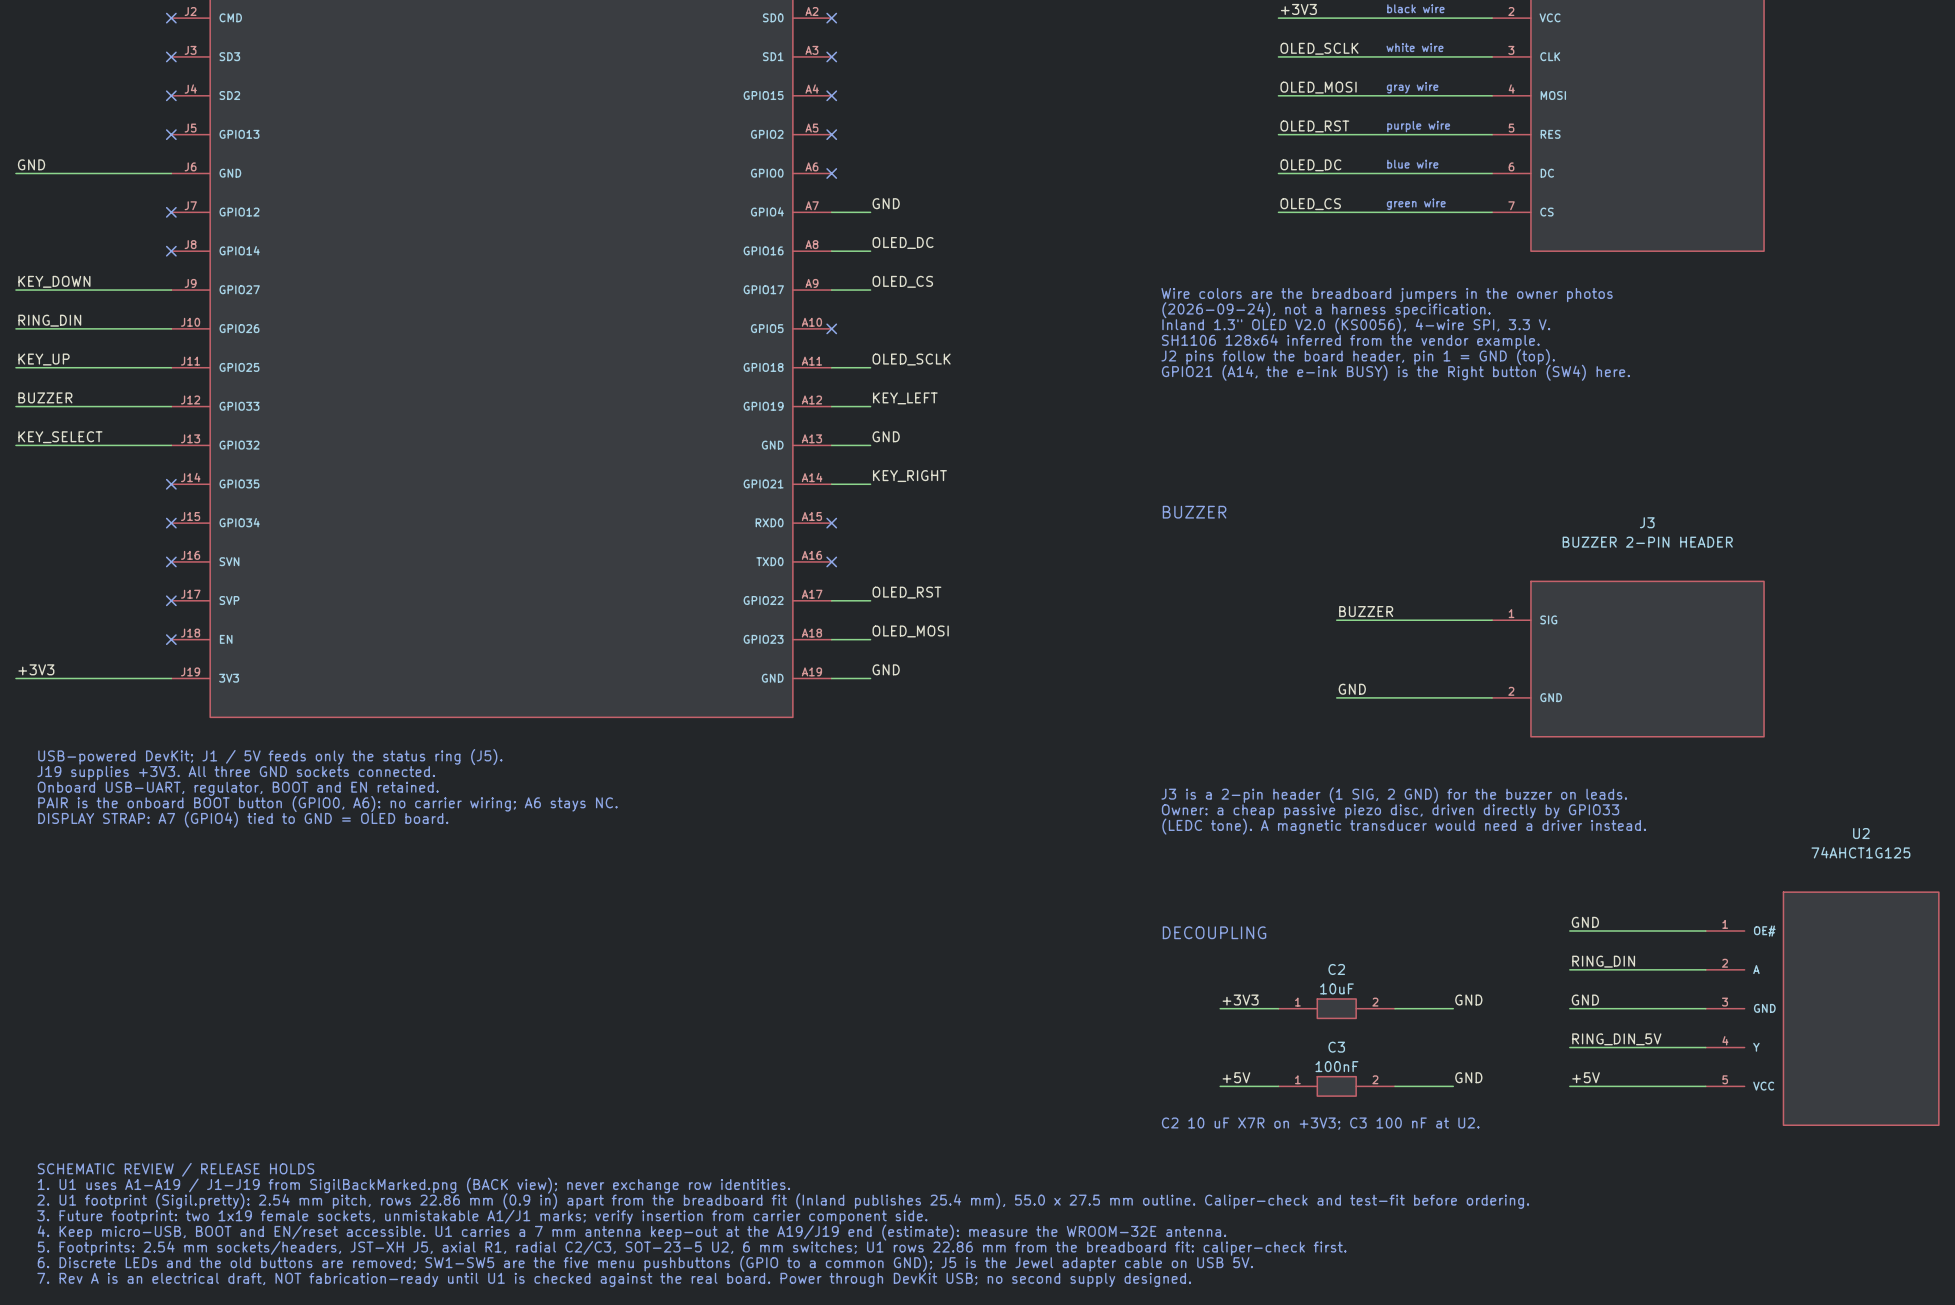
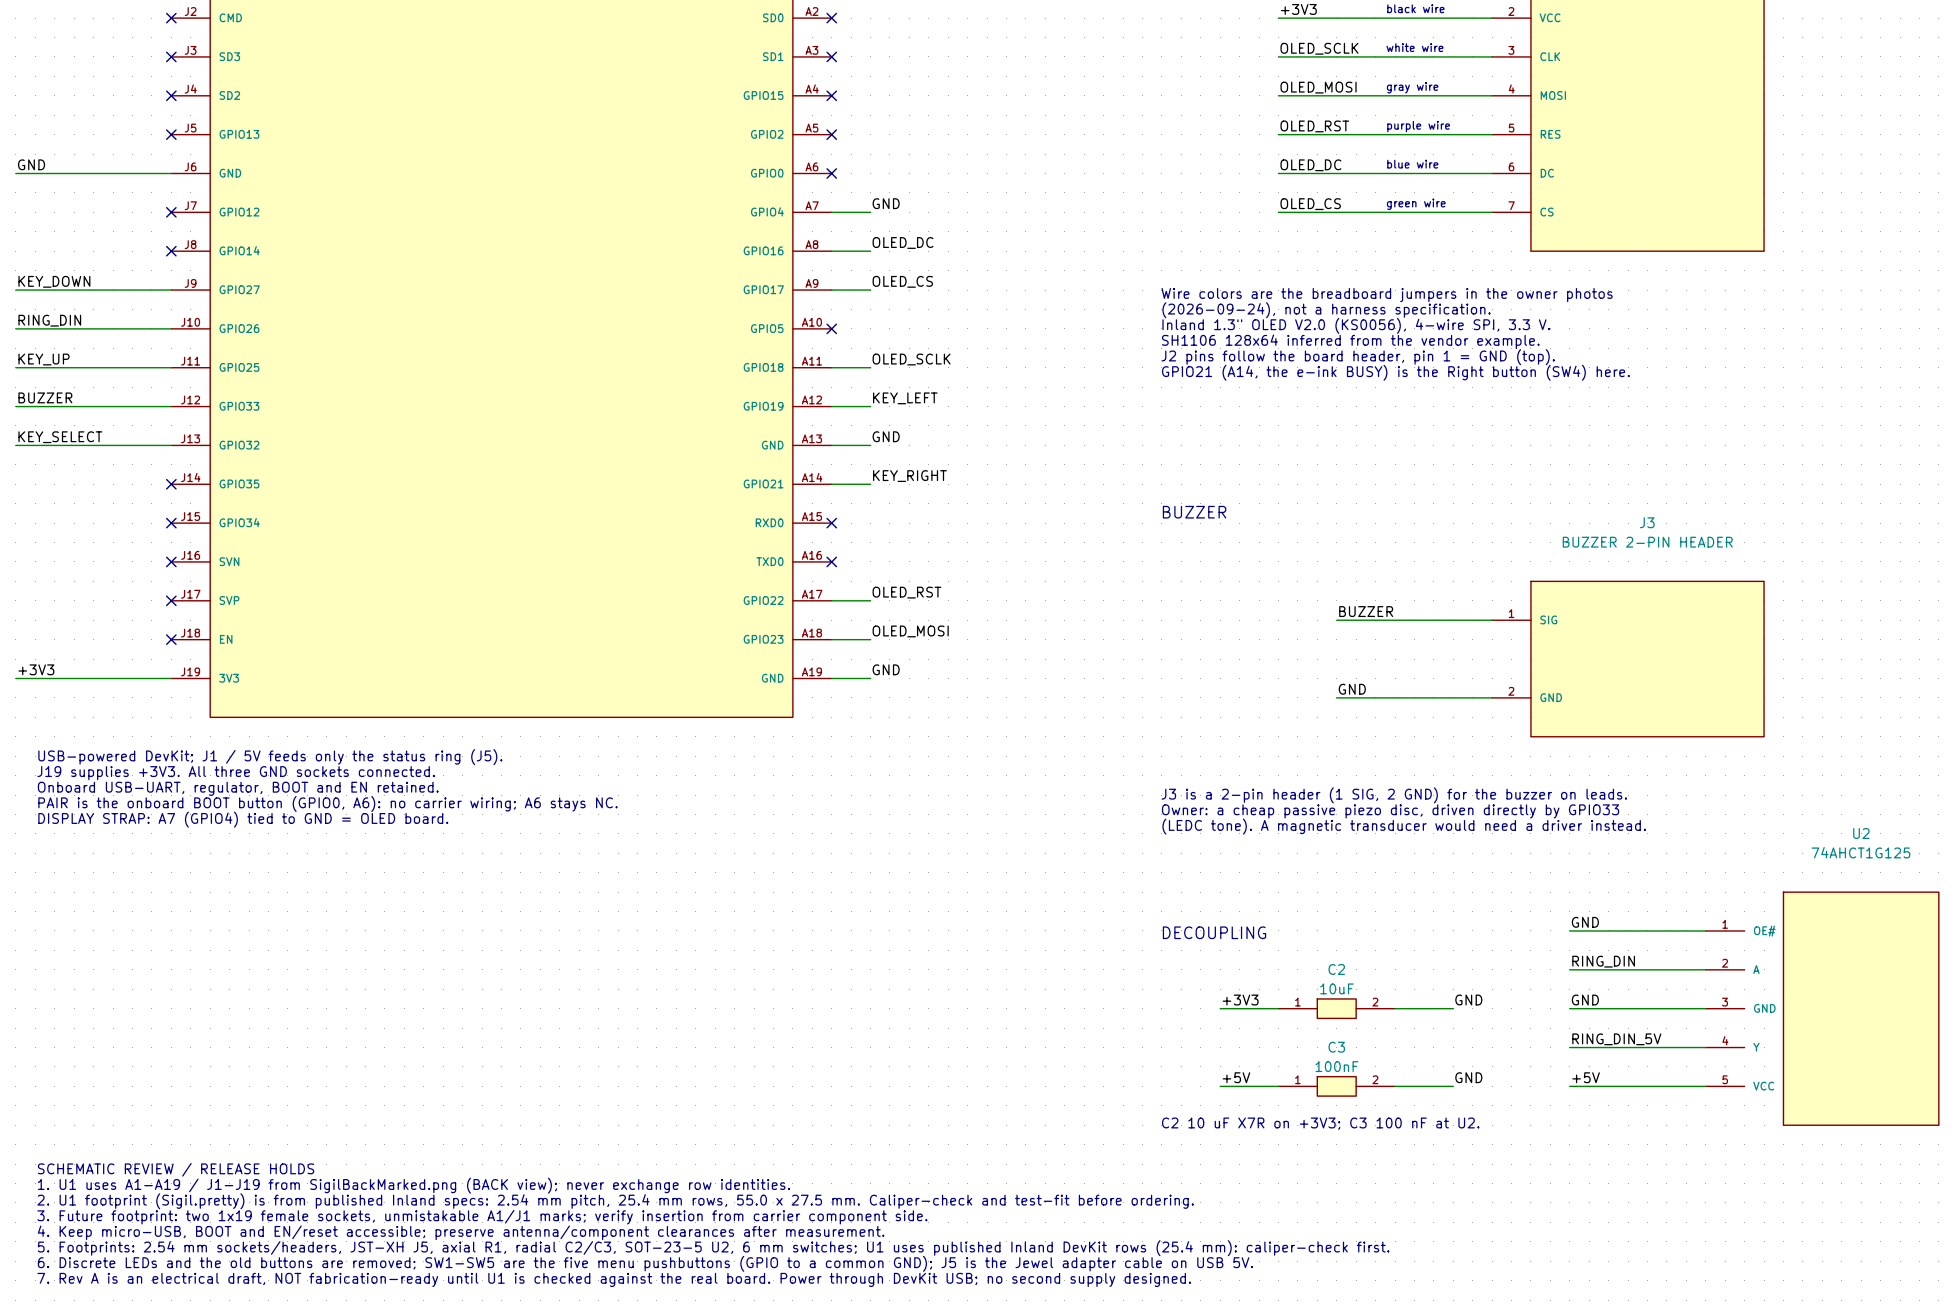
text: 2. U1 footprint (Sigil.pretty): 2.54 mm pitch, rows 22.86 mm (0.9 in) apart from the breadboard fit (Inland publishes 25.4 mm), 55.0 x 27.5 mm outline. Caliper-check and test-fit before ordering. (783, 1201) -> 2. U1 footprint (Sigil.pretty) is from published Inland specs: 2.54 mm pitch, 25.4 mm rows, 55.0 x 27.5 mm. Caliper-check and test-fit before ordering. (615, 1201)
text: 4. Keep micro-USB, BOOT and EN/reset accessible. U1 carries a 7 mm antenna keep-out at the A19/J19 end (estimate): measure the WROOM-32E antenna. (632, 1232) -> 4. Keep micro-USB, BOOT and EN/reset accessible; preserve antenna/component clearances after measurement. (461, 1232)
text: 5. Footprints: 2.54 mm sockets/headers, JST-XH J5, axial R1, radial C2/C3, SOT-23-5 U2, 6 mm switches; U1 rows 22.86 mm from the breadboard fit: caliper-check first. (692, 1248) -> 5. Footprints: 2.54 mm sockets/headers, JST-XH J5, axial R1, radial C2/C3, SOT-23-5 U2, 6 mm switches; U1 uses published Inland DevKit rows (25.4 mm): caliper-check first. (713, 1248)

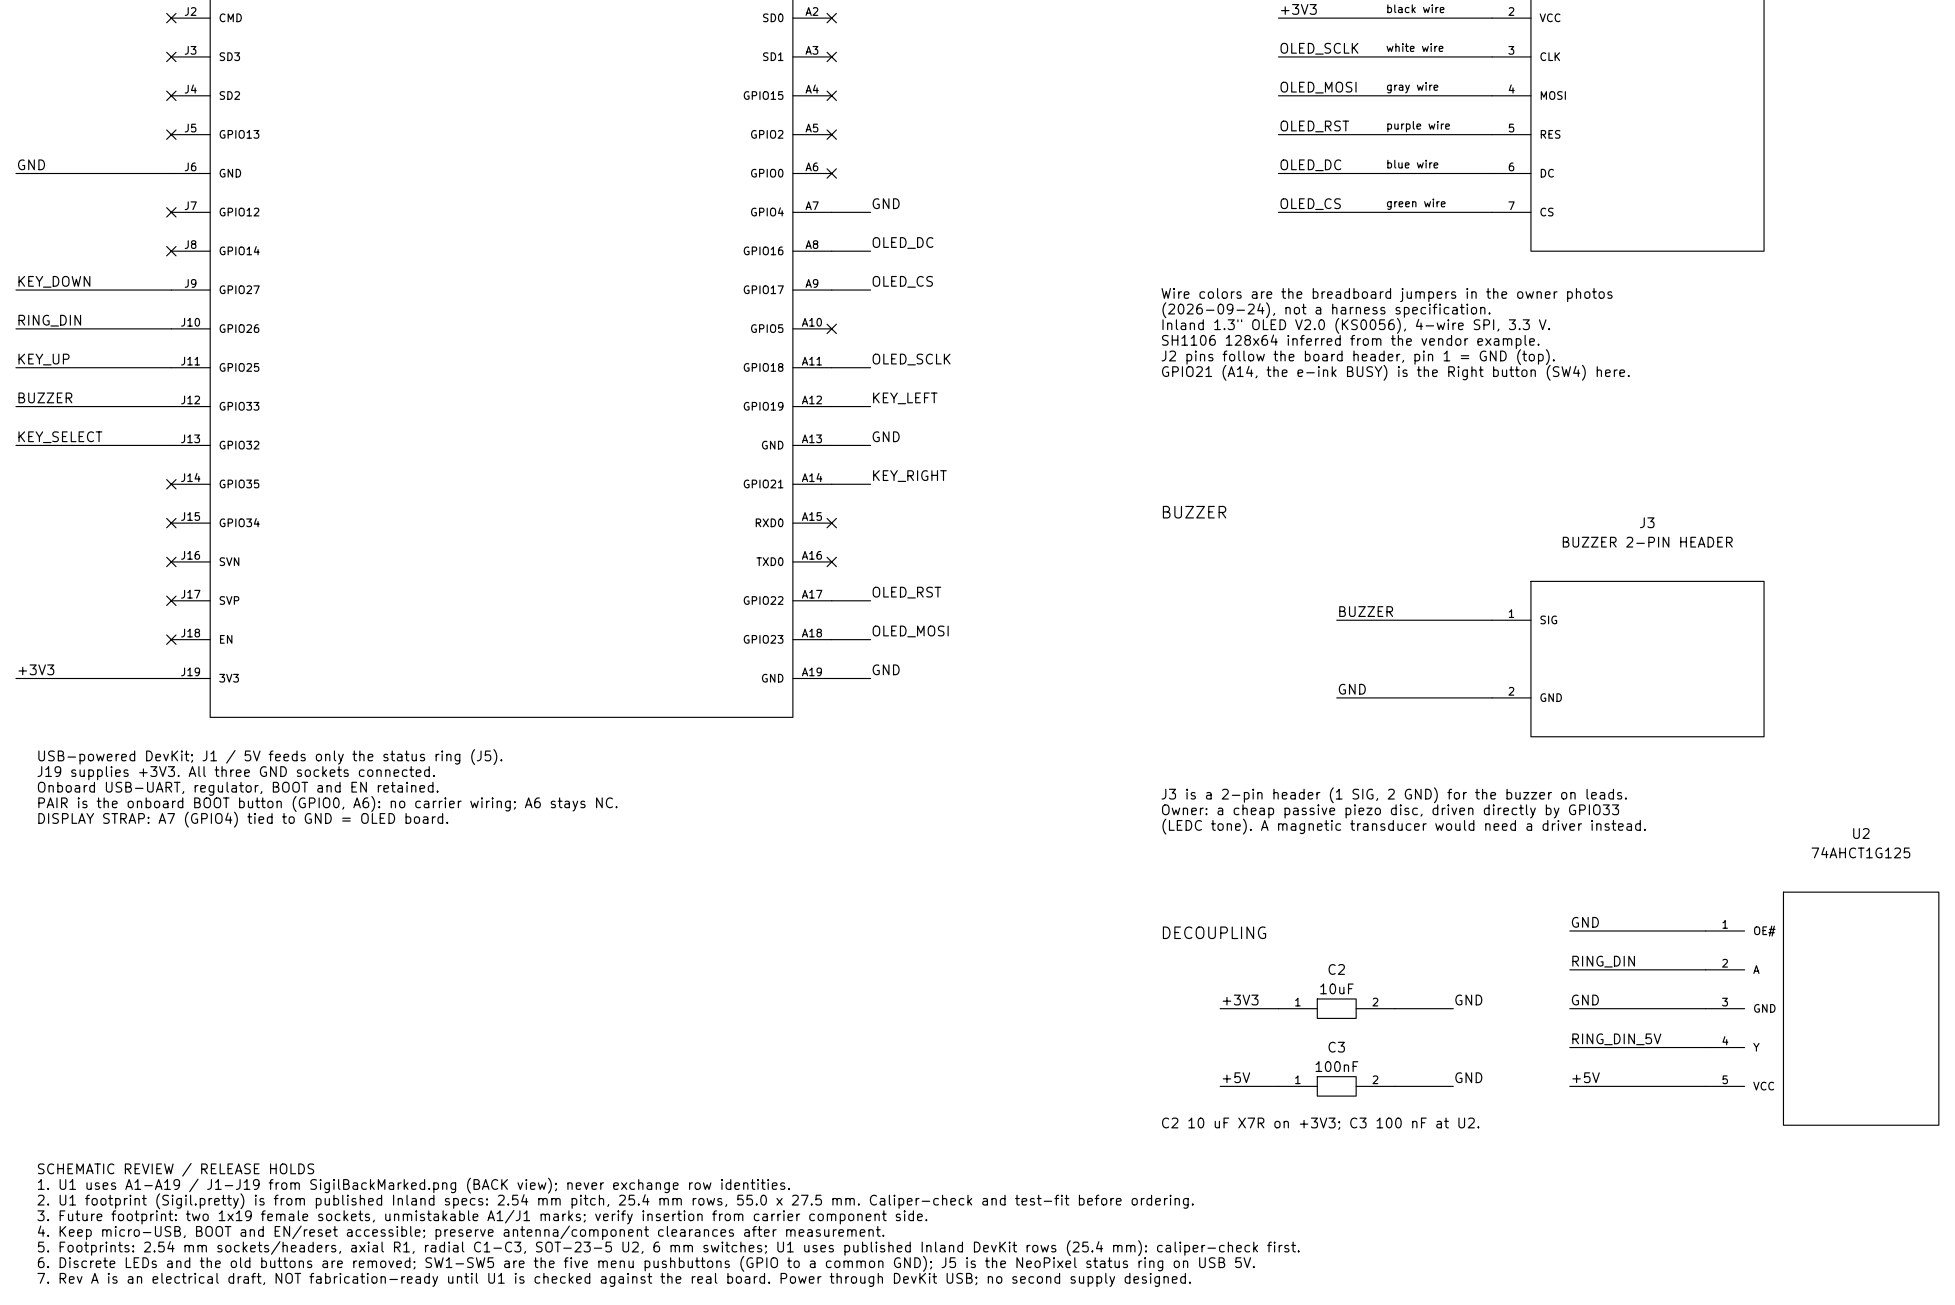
text: 5. Footprints: 2.54 mm sockets/headers, JST-XH J5, axial R1, radial C2/C3, SOT-23-5 U2, 6 mm switches; U1 uses published Inland DevKit rows (25.4 mm): caliper-check first. (713, 1248) -> 5. Footprints: 2.54 mm sockets/headers, axial R1, radial C1-C3, SOT-23-5 U2, 6 mm switches; U1 uses published Inland DevKit rows (25.4 mm): caliper-check first. (668, 1248)
text: 6. Discrete LEDs and the old buttons are removed; SW1-SW5 are the five menu pushbuttons (GPIO to a common GND); J5 is the Jewel adapter cable on USB 5V. (645, 1263) -> 6. Discrete LEDs and the old buttons are removed; SW1-SW5 are the five menu pushbuttons (GPIO to a common GND); J5 is the NeoPixel status ring on USB 5V. (646, 1263)

